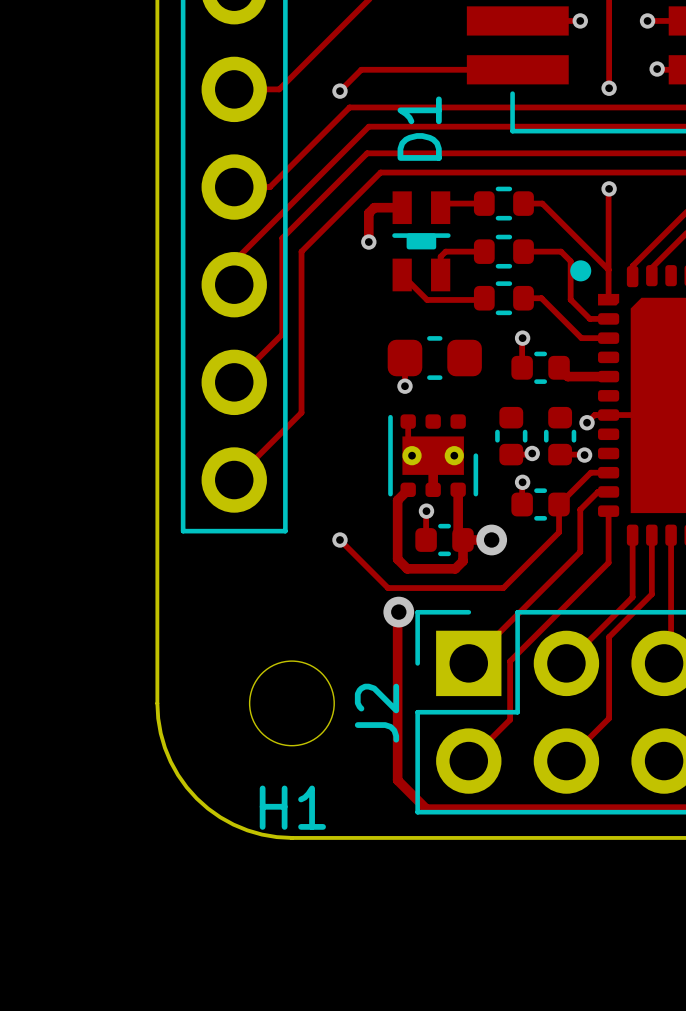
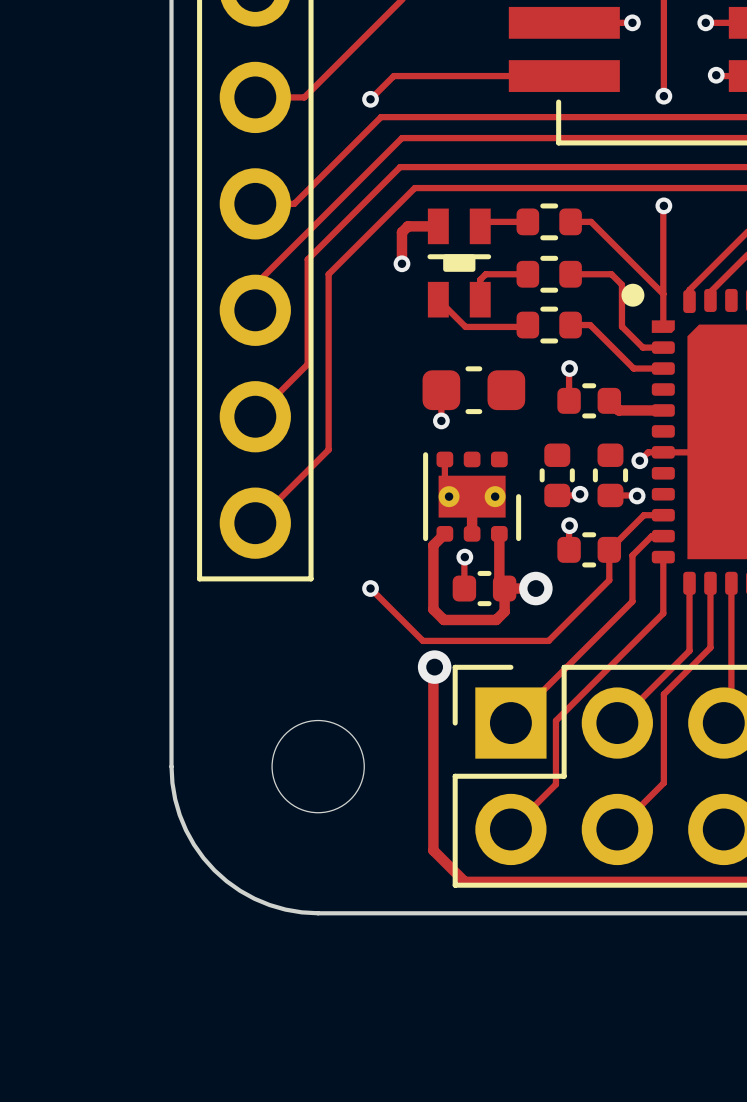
D1 name: D1 (419, 128) -> none
J2 name: J2 (376, 713) -> none
H1 name: H1 (292, 807) -> none

